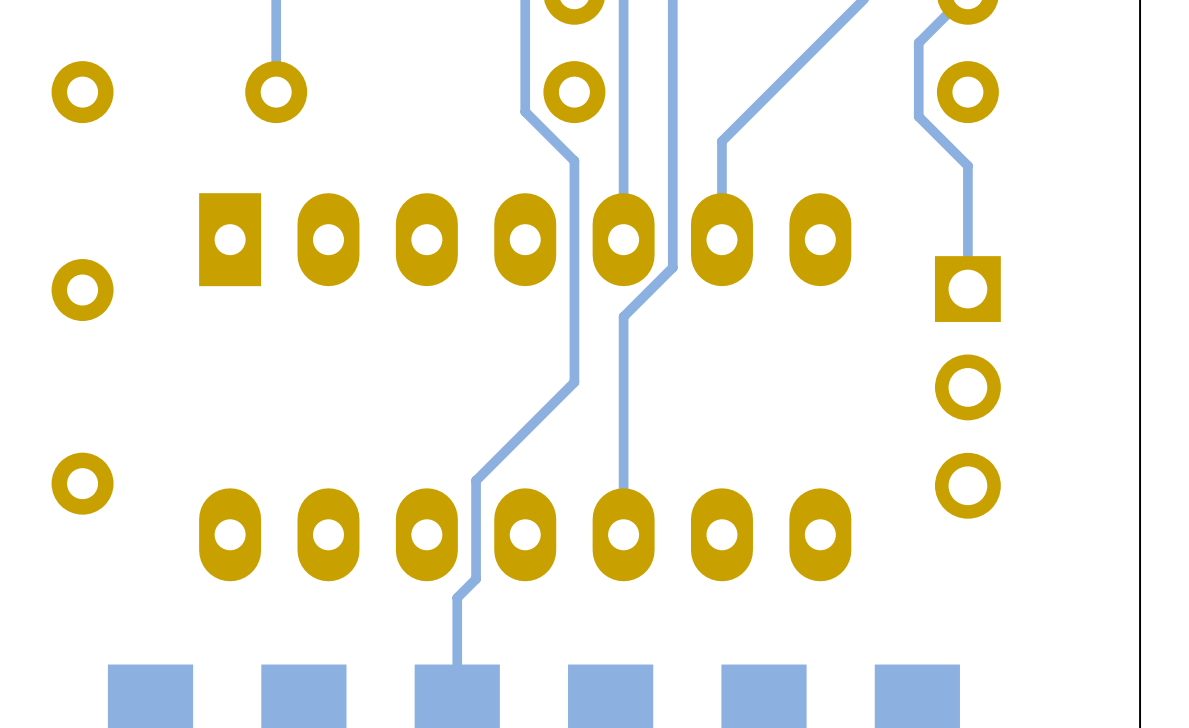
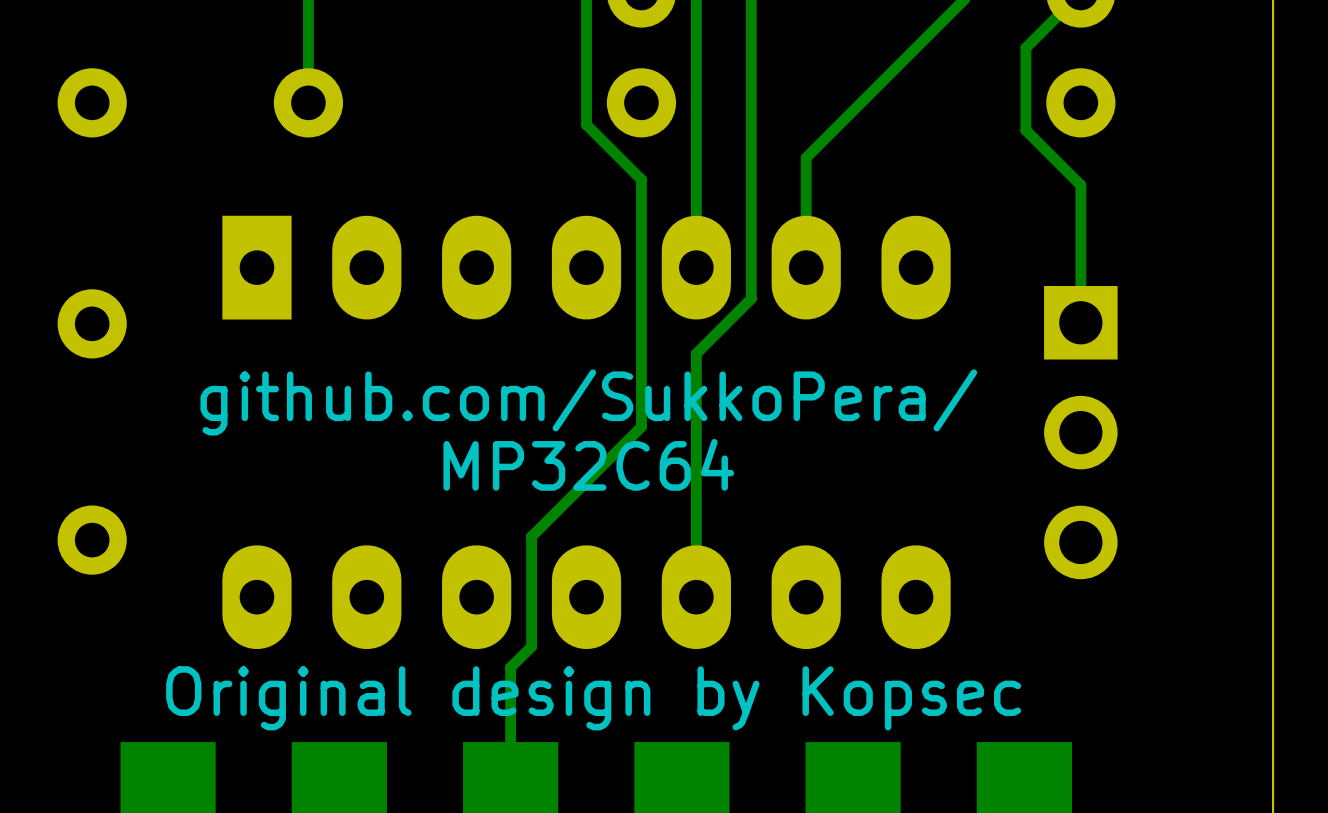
text: none -> github.com/SukkoPera/ (588, 402)
text: none -> MP32C64 (588, 464)
text: none -> Original design by Kopsec (593, 698)

